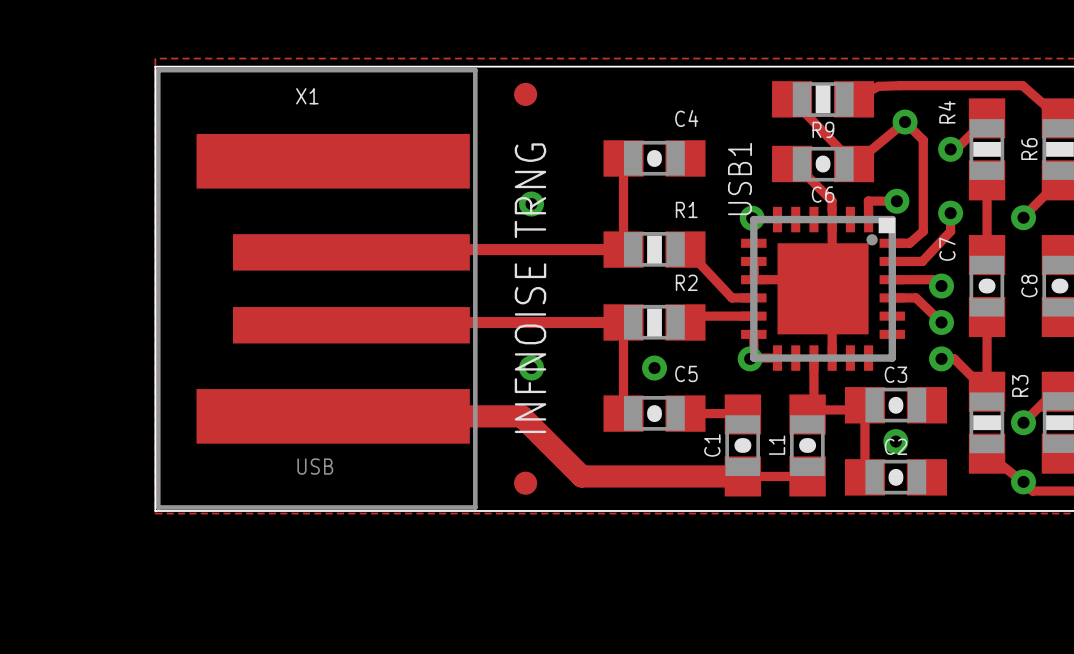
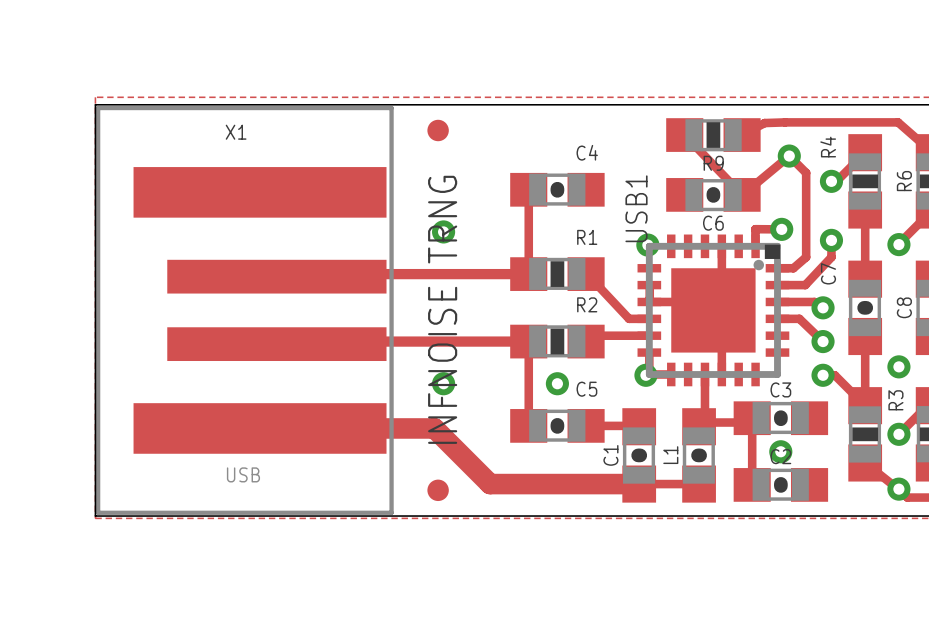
track: (807, 175) (832, 200) (832, 210) -> none
via: none -> (898, 366)

